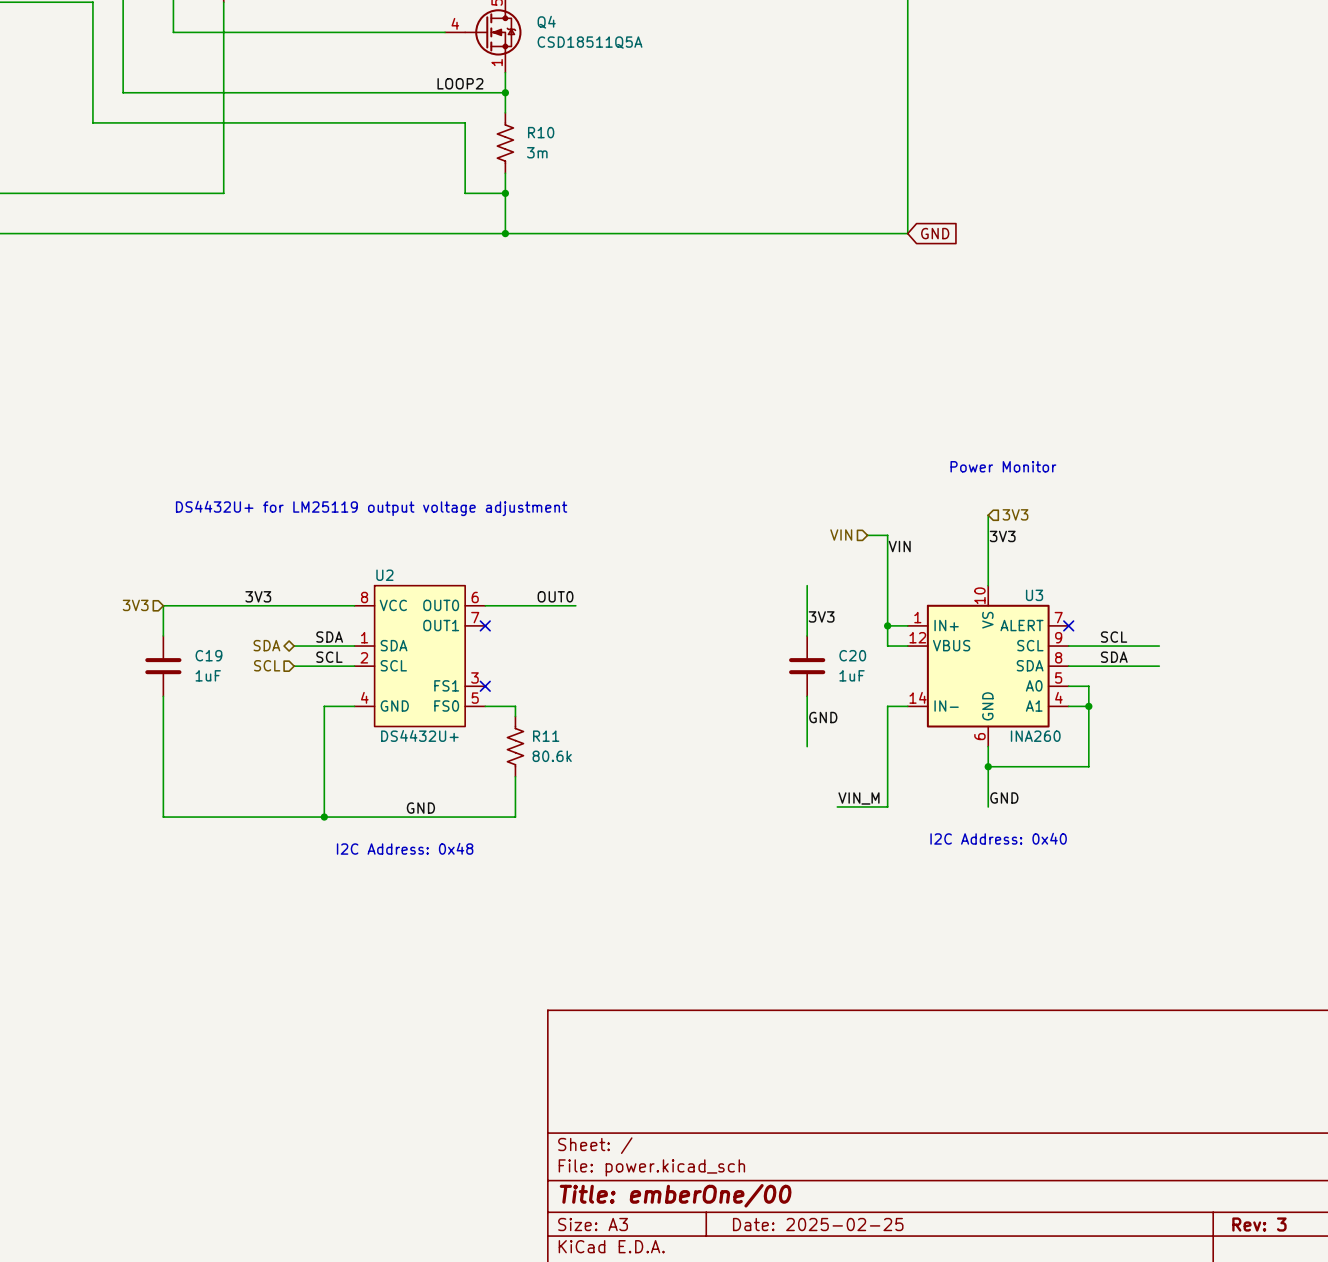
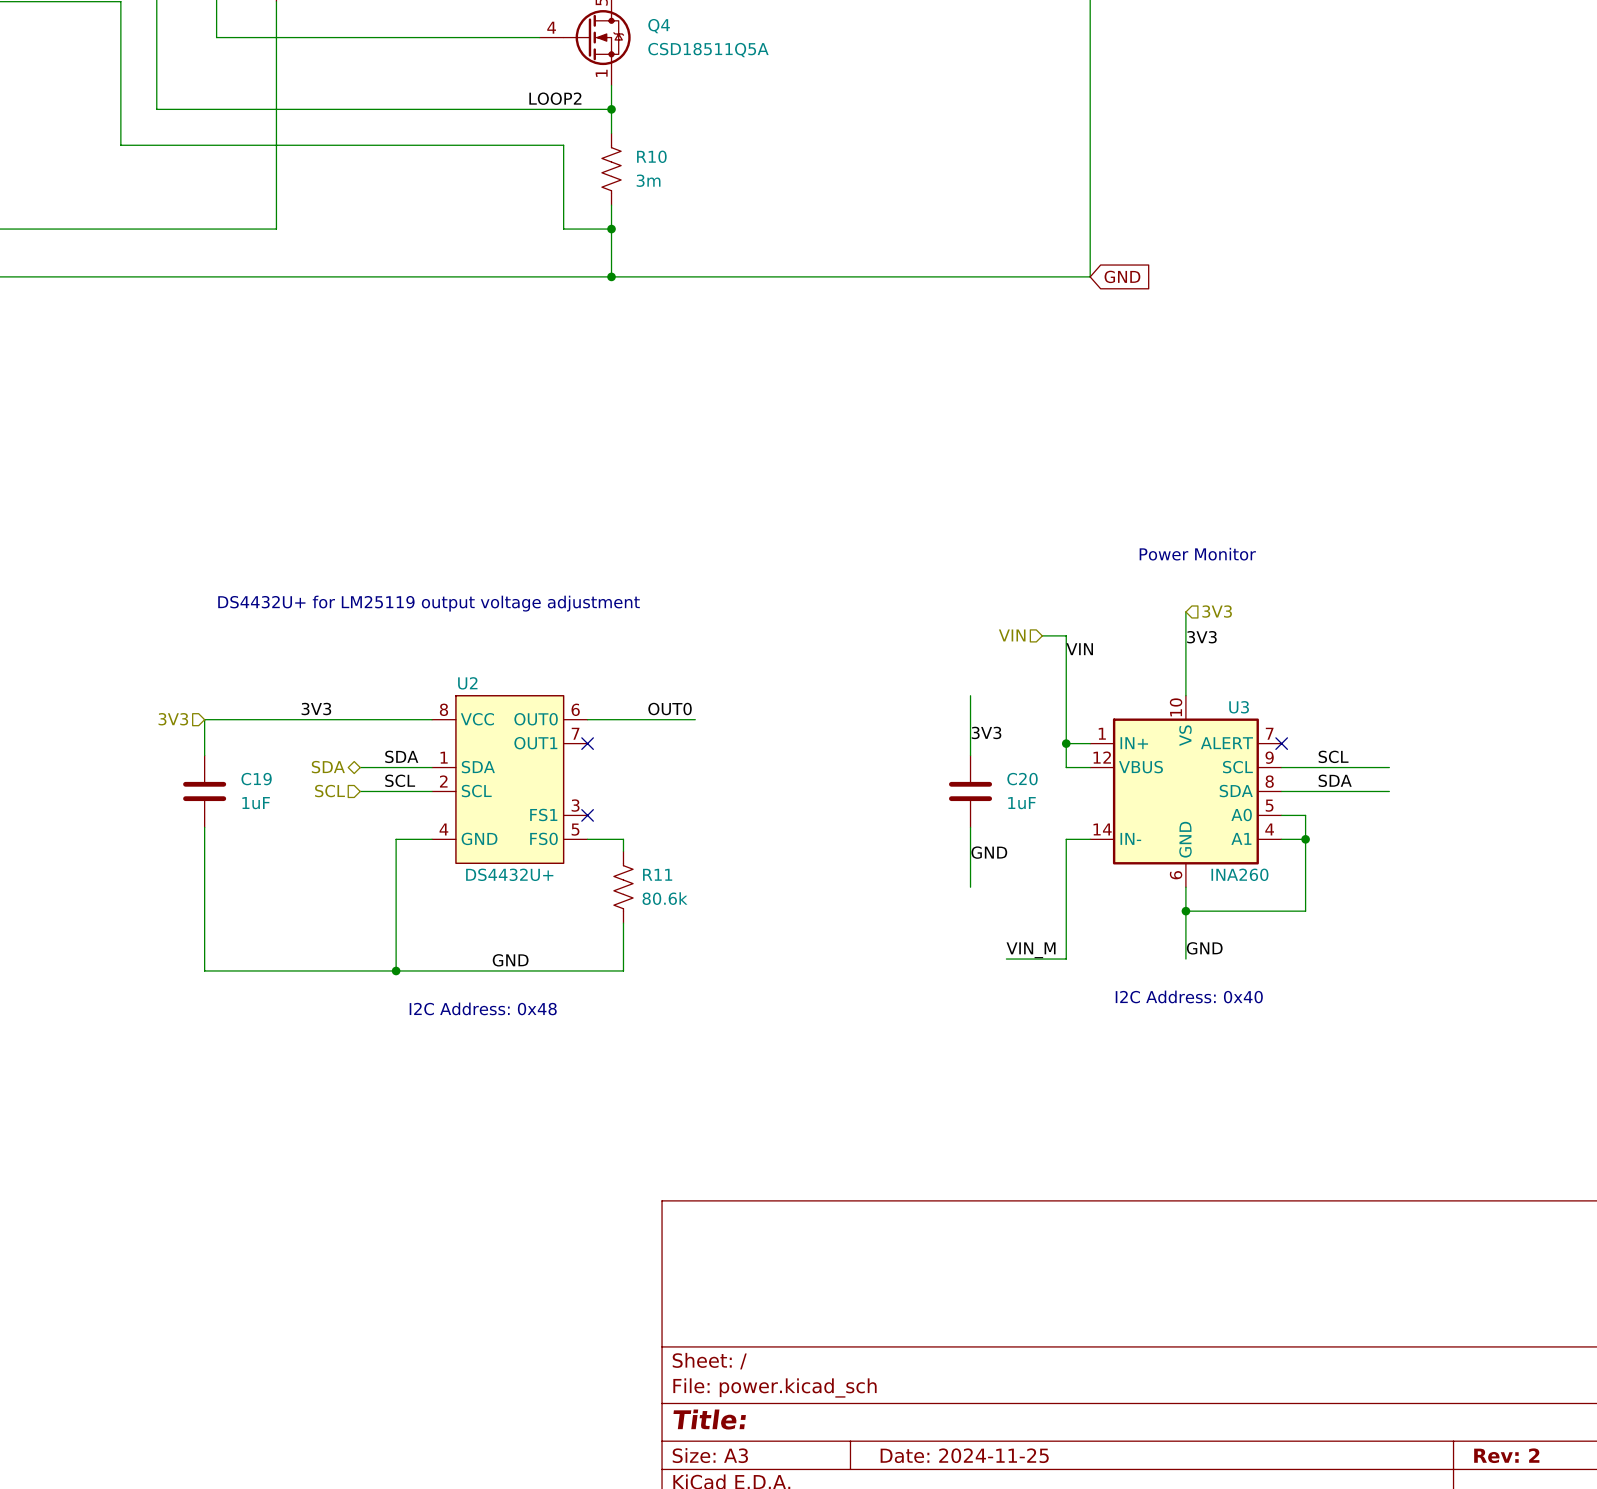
title block: Title: emberOne/00 (675, 1195) -> Title: (709, 1419)
title block: Date: 2025-02-25 (818, 1224) -> Date: 2024-11-25 (964, 1455)
title block: Rev: 3 (1259, 1224) -> Rev: 2 (1506, 1455)

